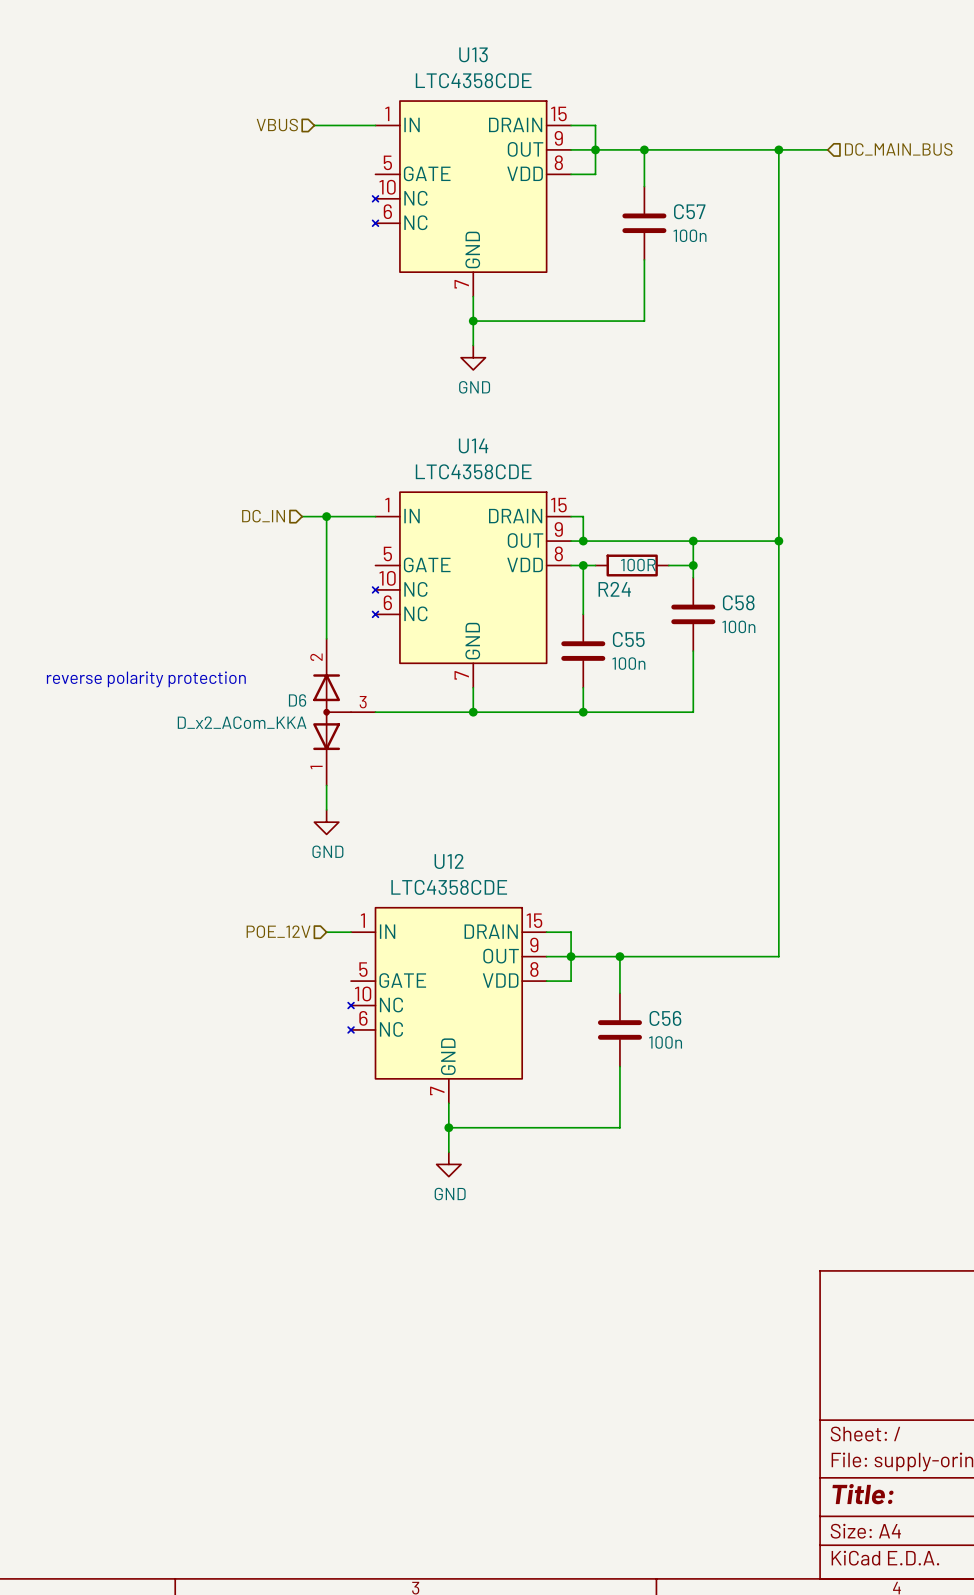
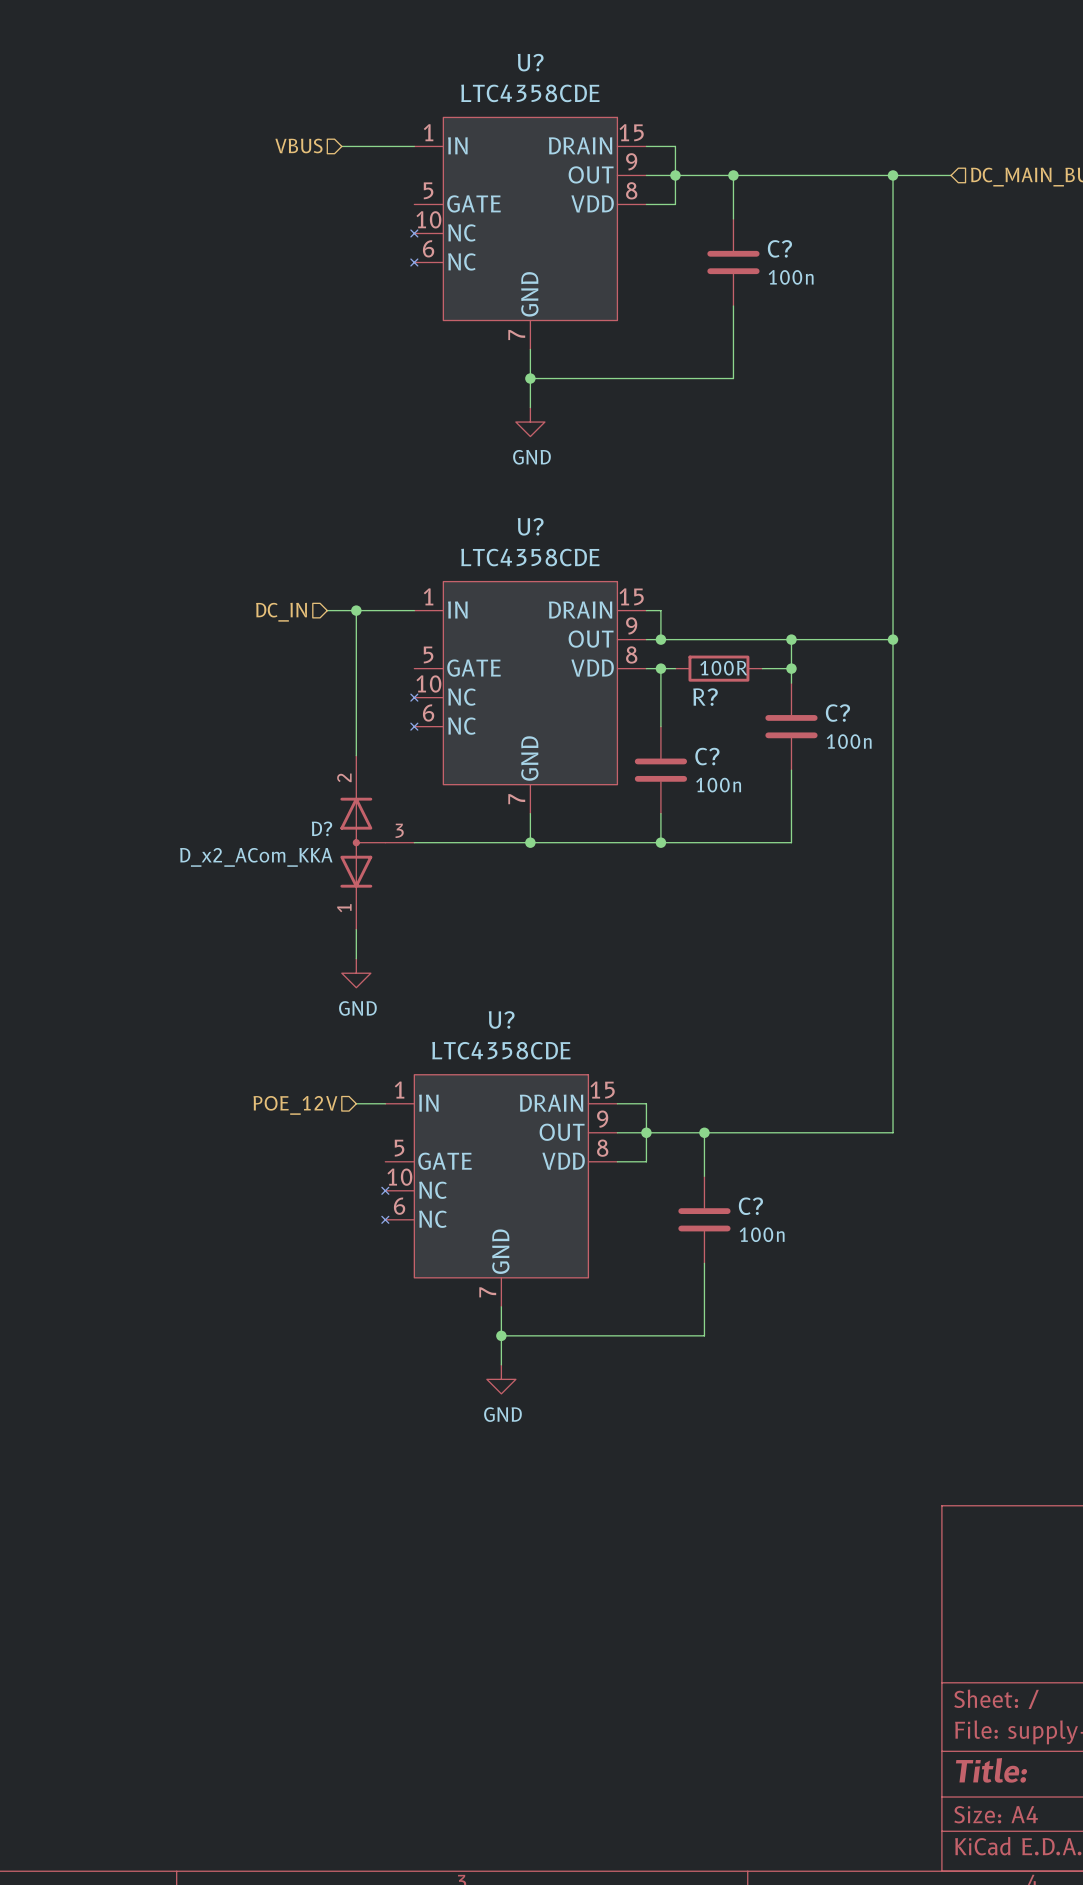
U13 name: U13 (473, 54) -> U? (530, 62)
C57 name: C57 (689, 211) -> C? (779, 248)
U14 name: U14 (473, 445) -> U? (530, 526)
R24 name: R24 (614, 589) -> R? (705, 697)
C58 name: C58 (738, 602) -> C? (837, 713)
C55 name: C55 (628, 639) -> C? (707, 756)
text: reverse polarity protection (146, 679) -> none
D6 name: D6 (297, 700) -> D? (322, 828)
U12 name: U12 (449, 861) -> U? (501, 1019)
C56 name: C56 (665, 1018) -> C? (750, 1206)

